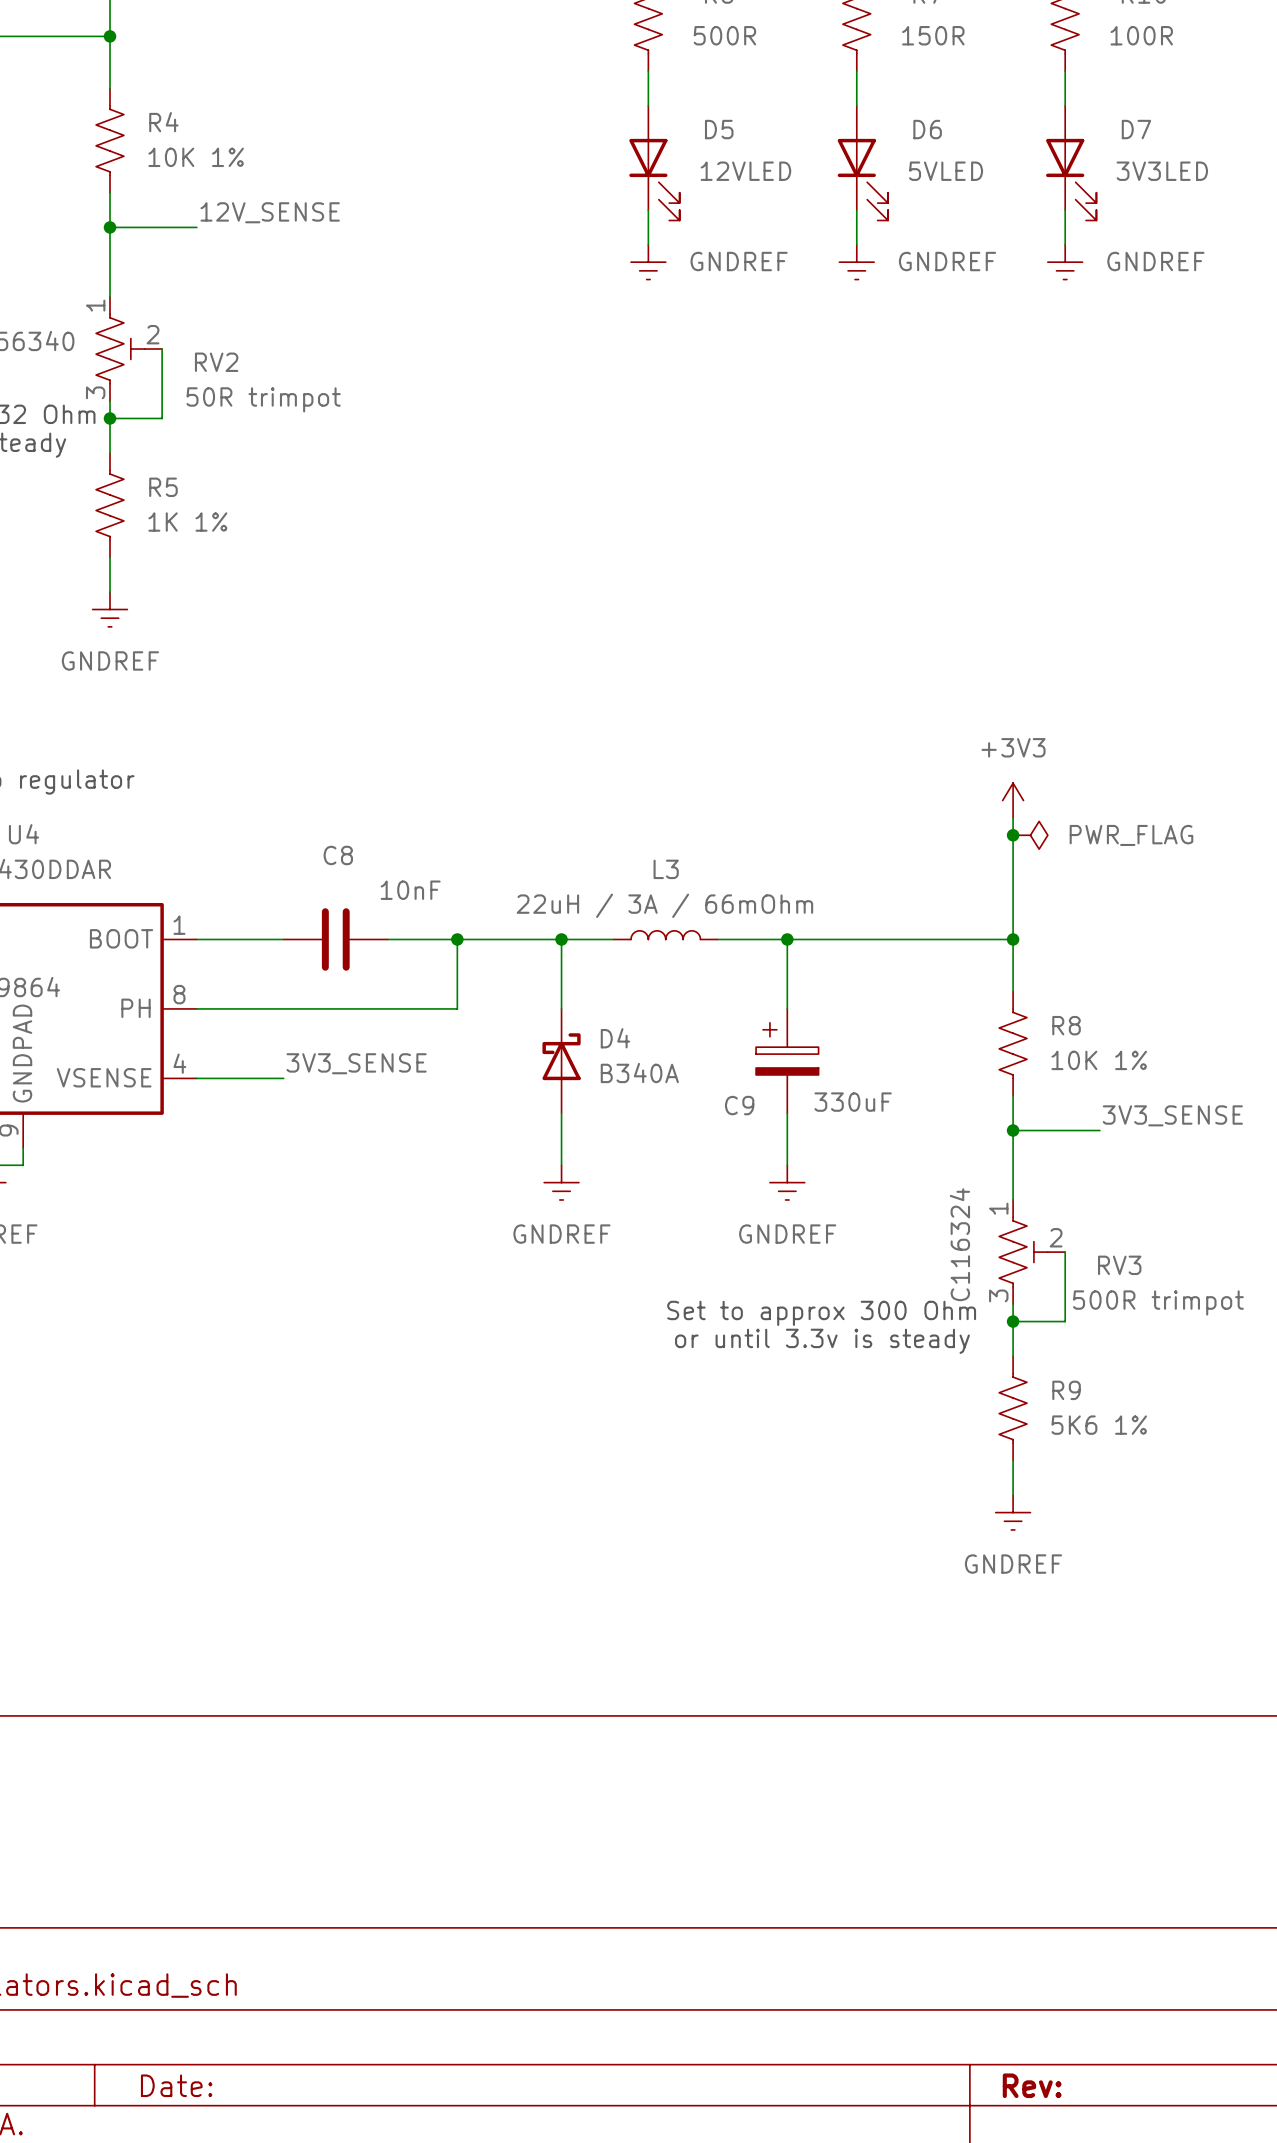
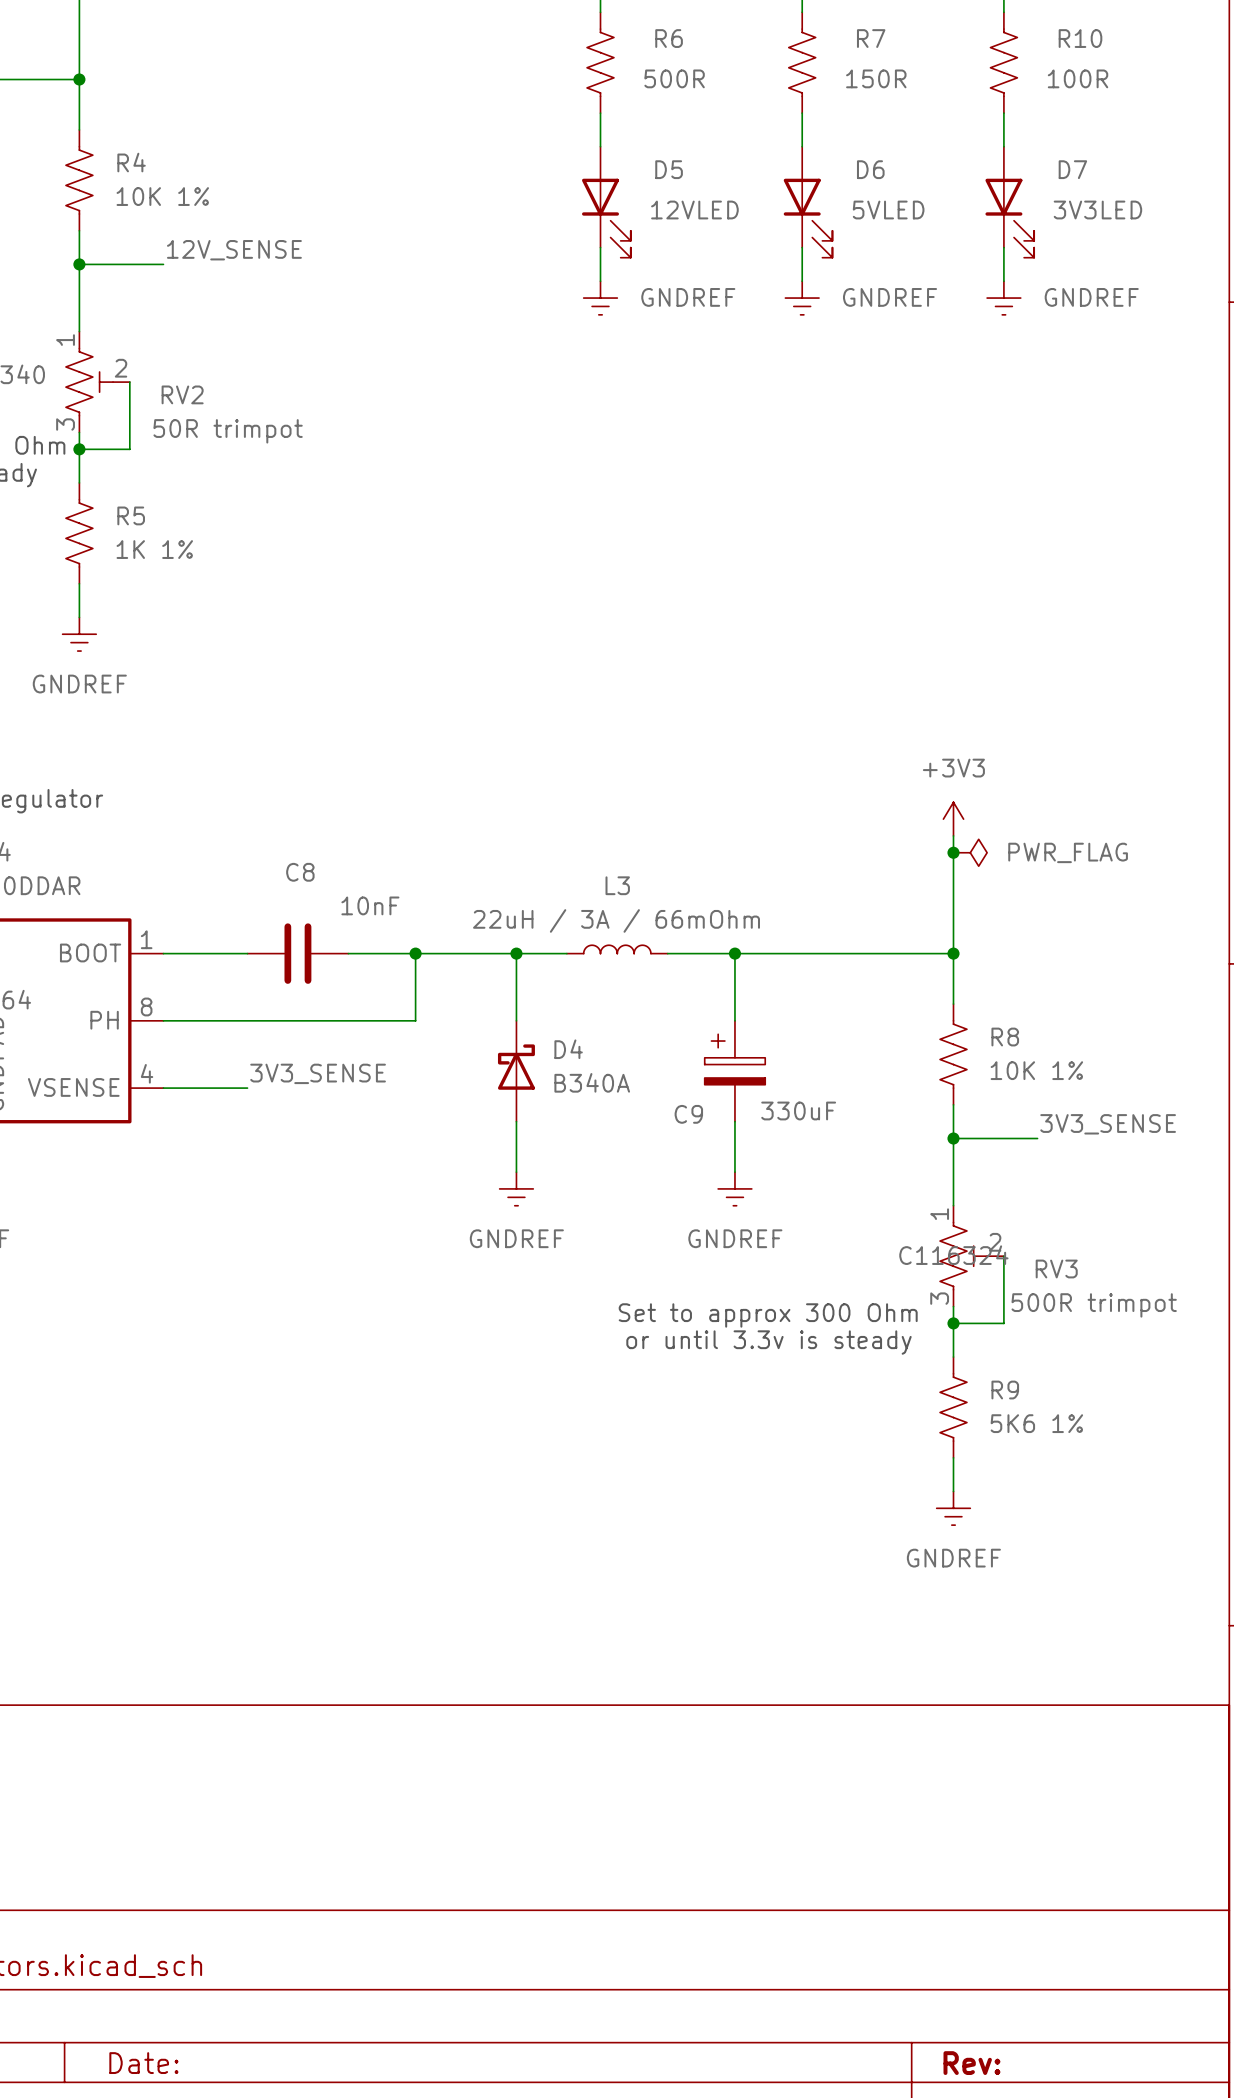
RV3 text rotation: 0° (959, 1244) -> 90° clockwise (953, 1255)

